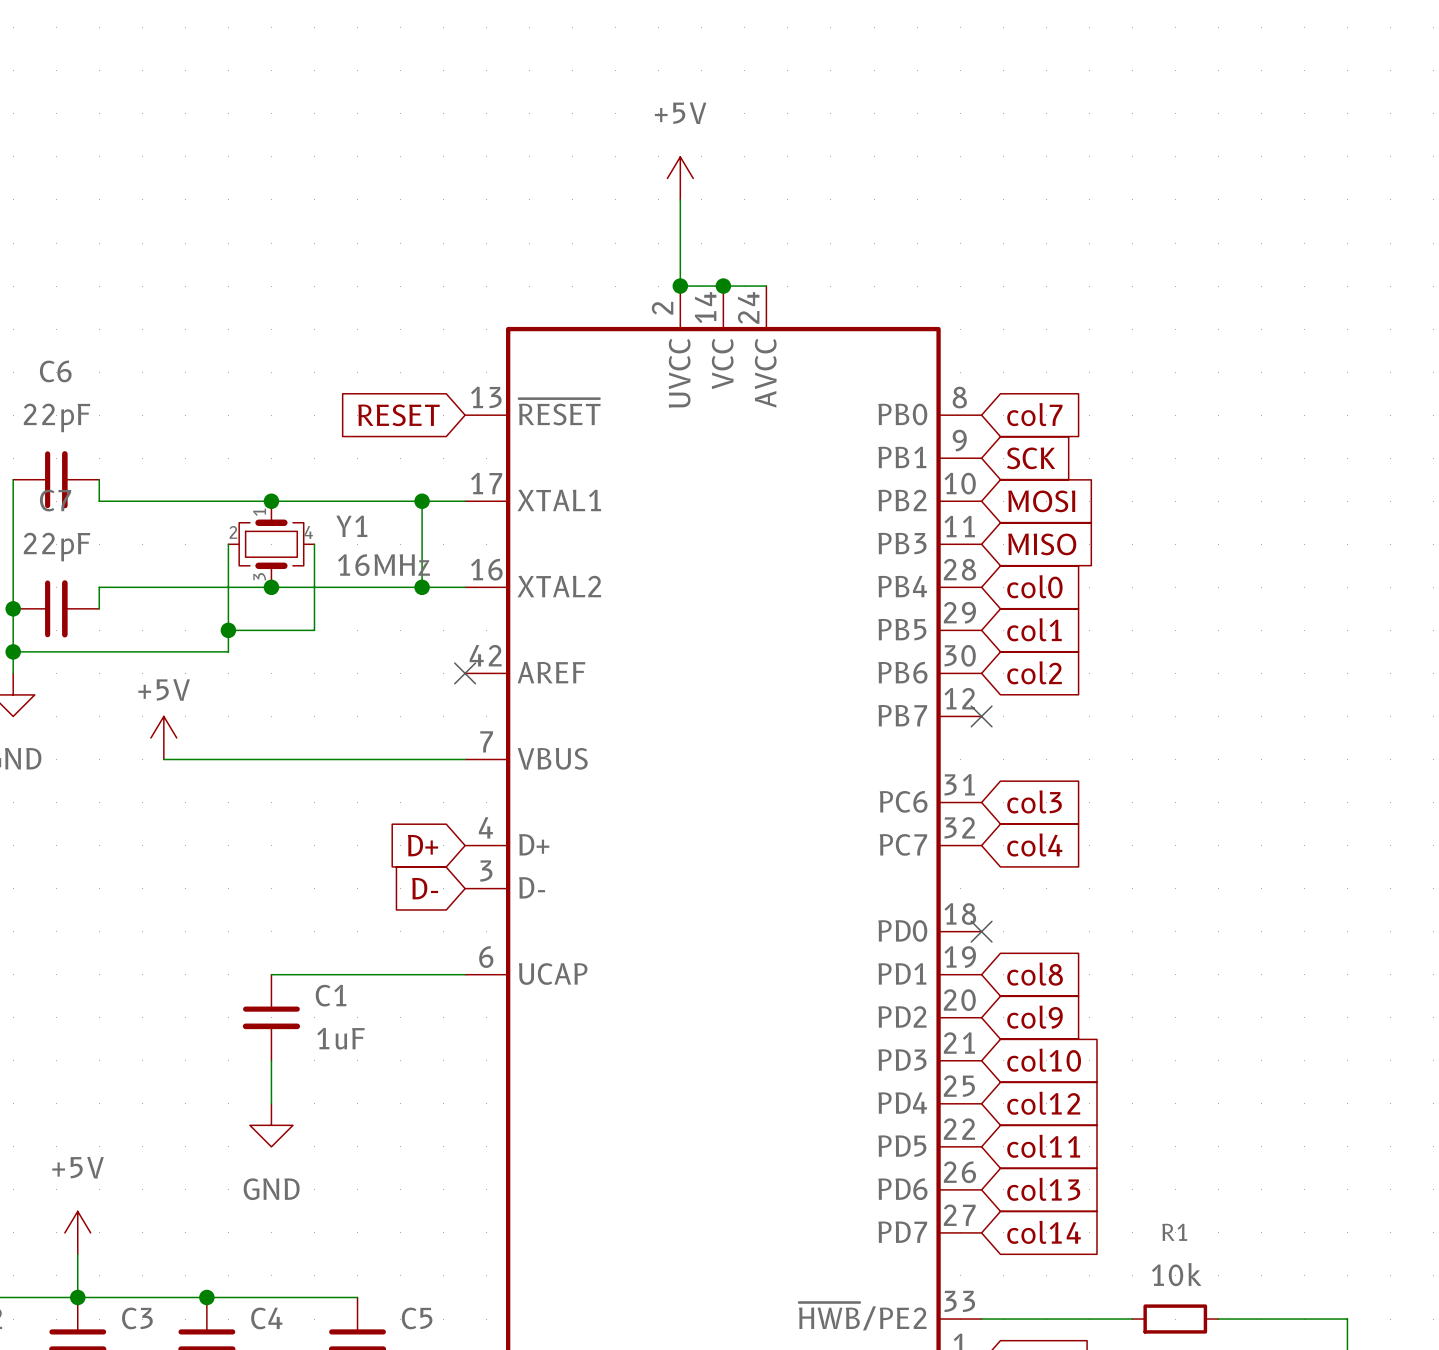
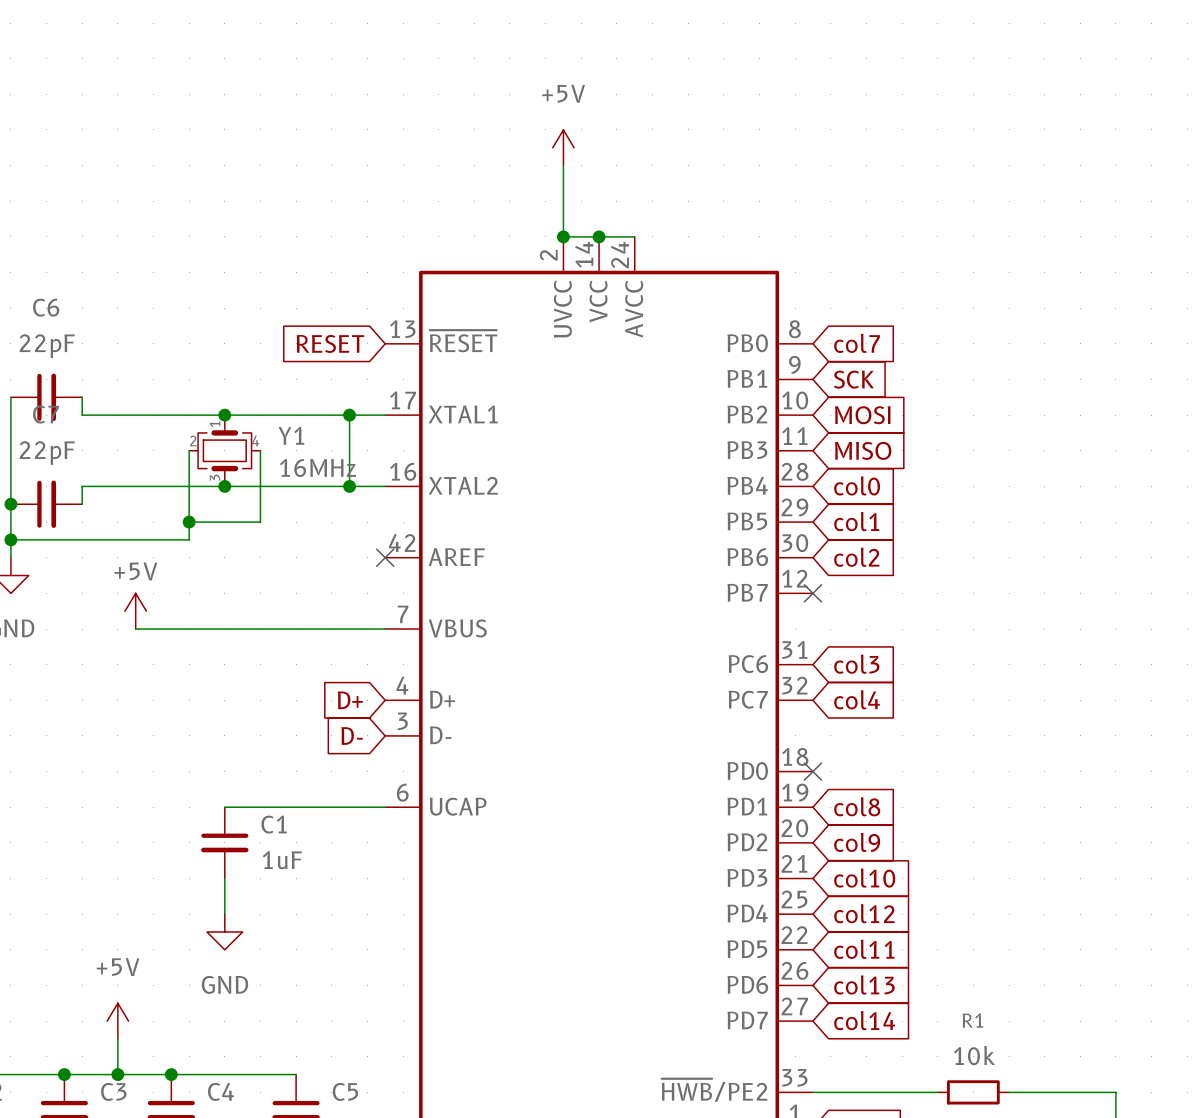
power symbol position: +5V (77, 1232) -> +5V (117, 1021)
wire: (77, 1254) (77, 1297) -> (117, 1038) (117, 1074)
junction: none -> (117, 1074)

